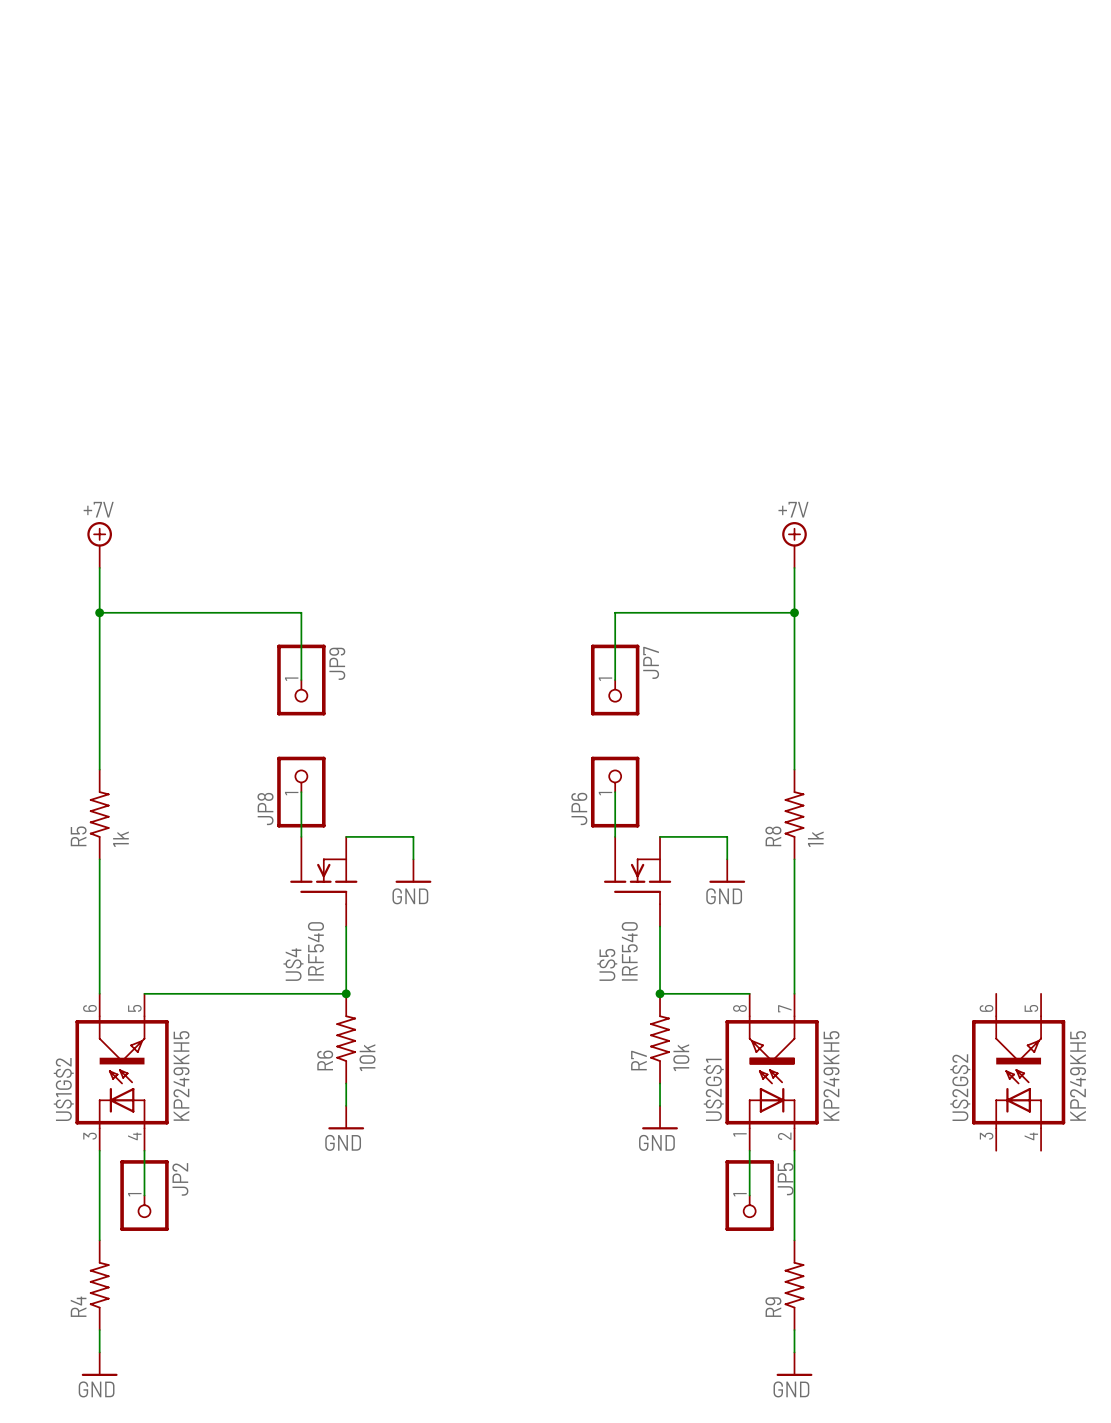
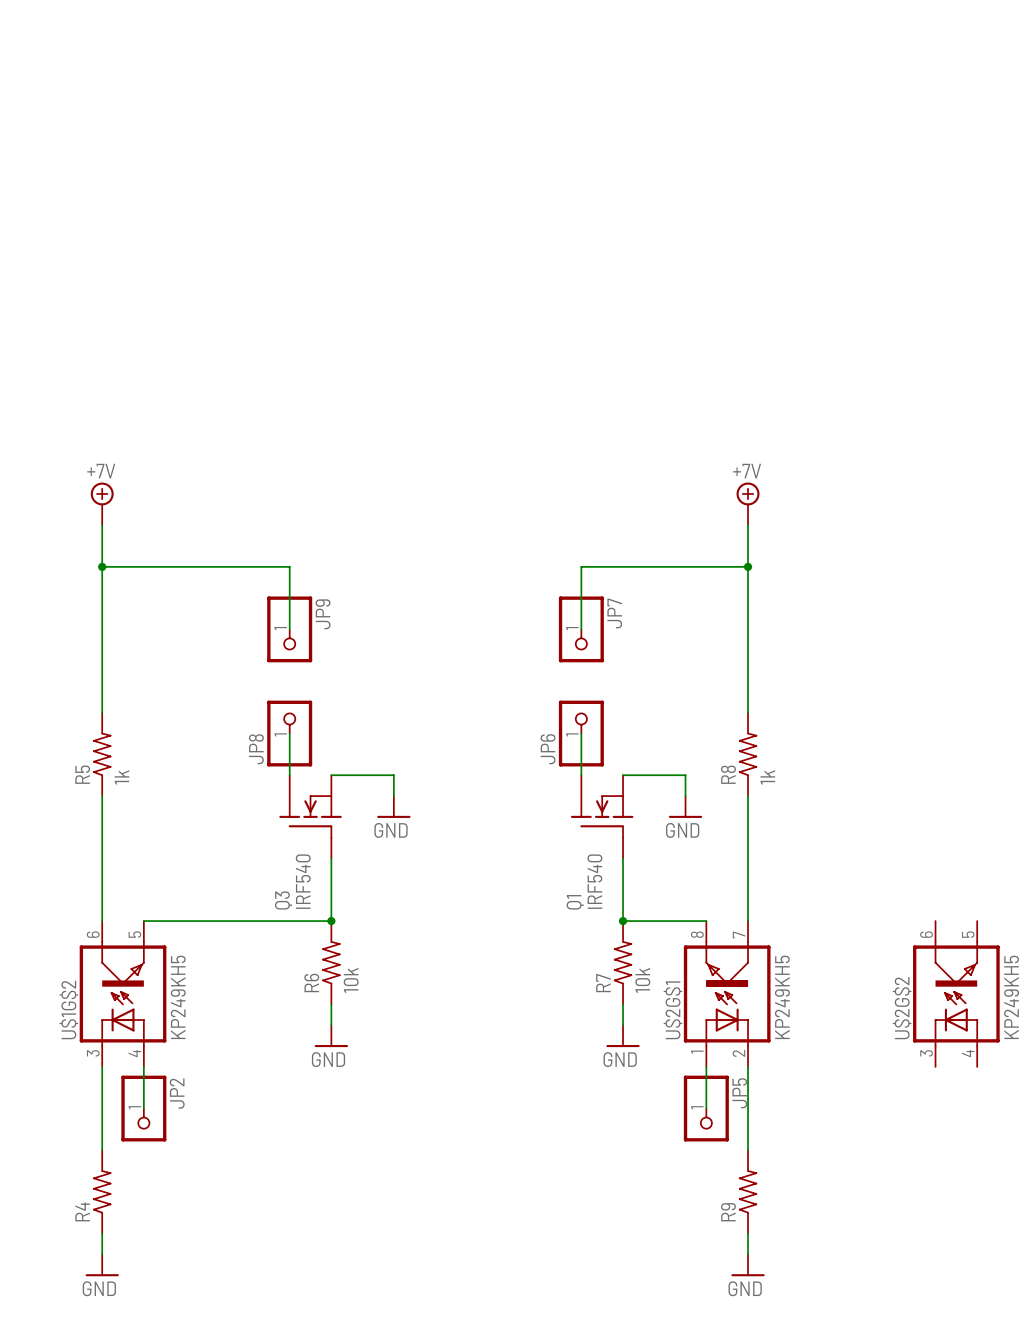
U$4 name: U$4 (293, 964) -> Q3 (283, 900)
U$5 name: U$5 (607, 964) -> Q1 (575, 902)

